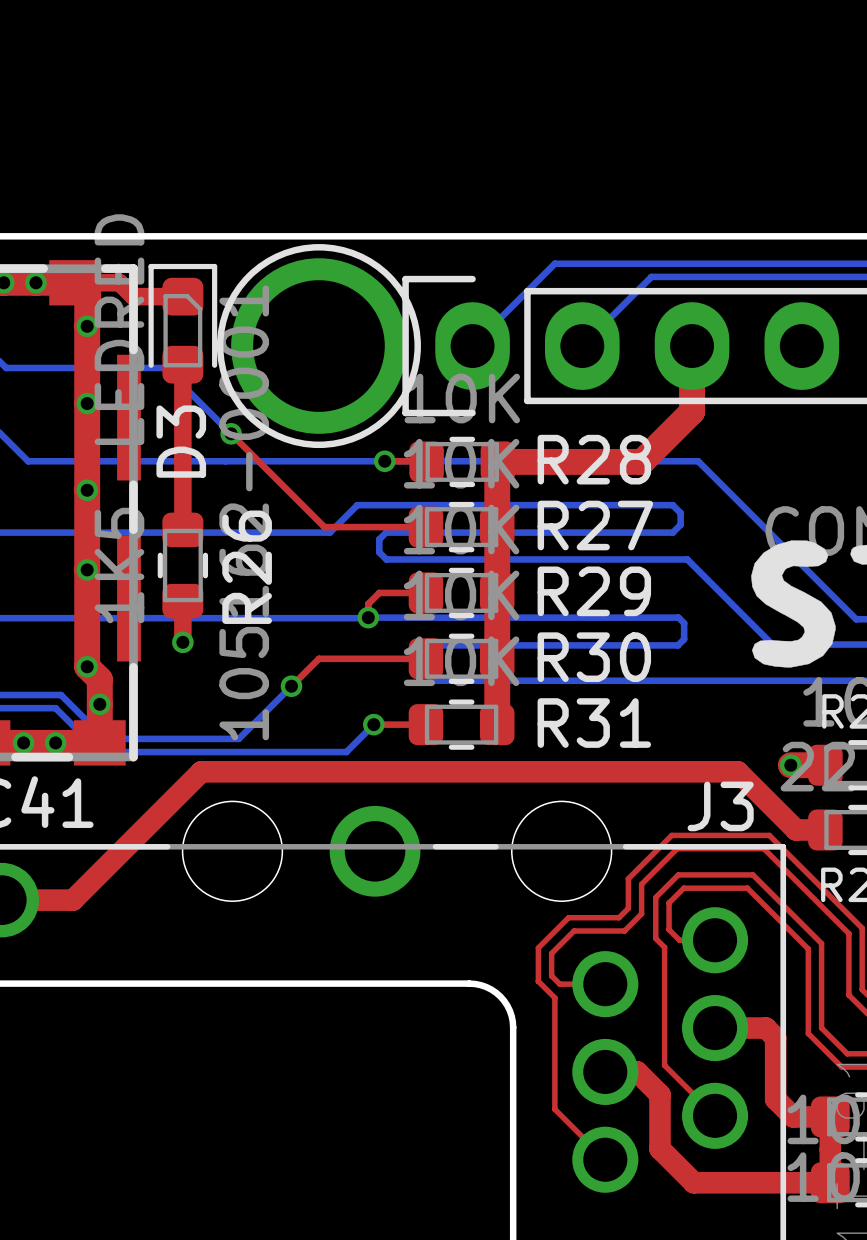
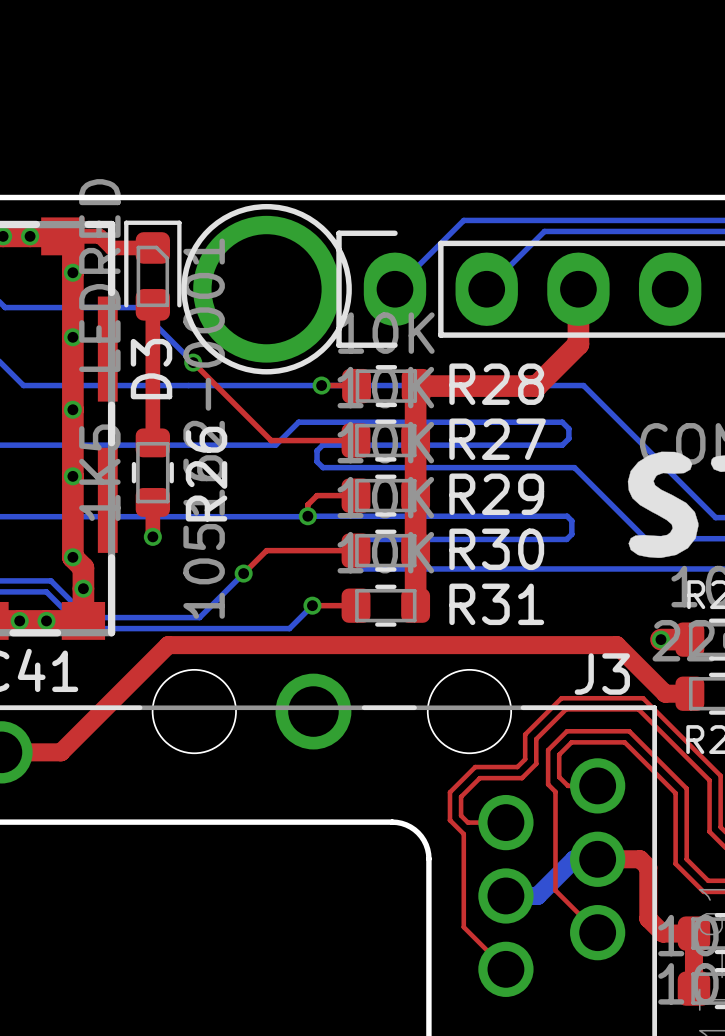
bottom track: none -> (597, 859) (574, 859) (537, 895) (505, 895)
top track: (605, 1071) (637, 1071) (660, 1094) (660, 1148) (693, 1182) (830, 1182) -> none

